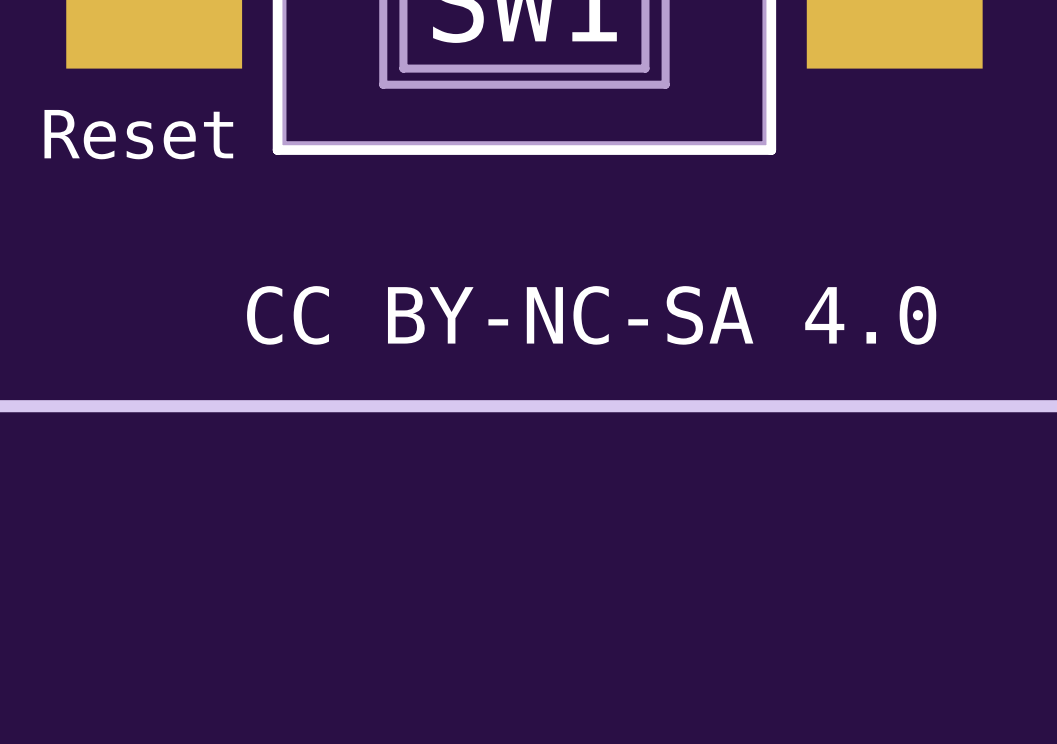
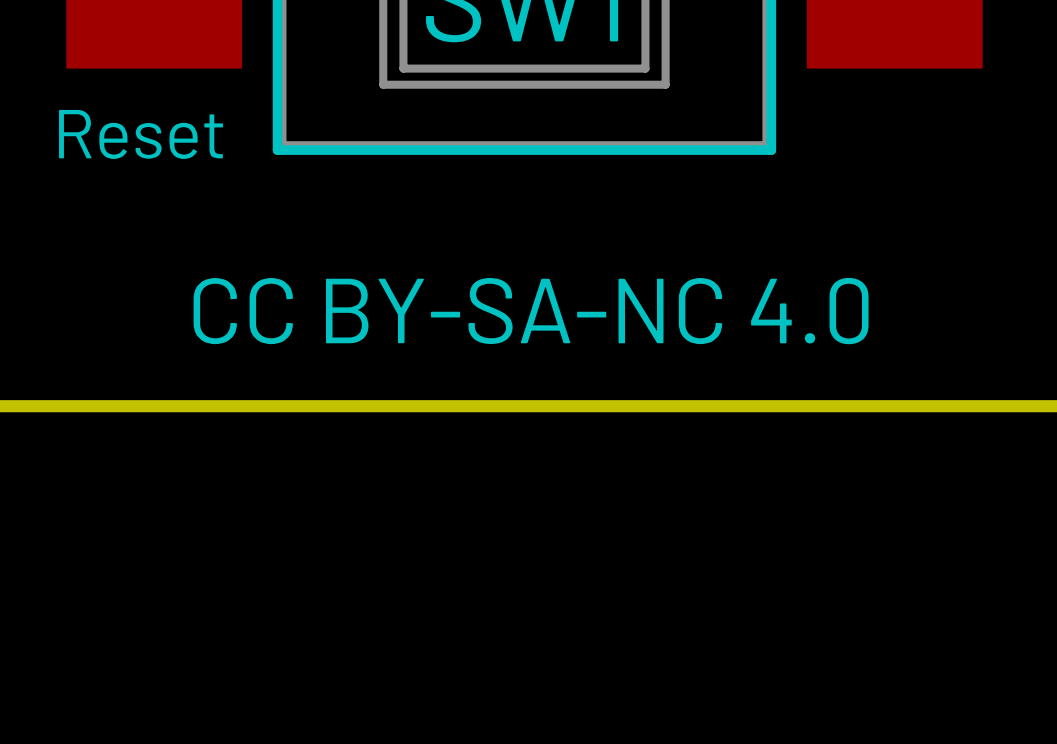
text: CC BY-NC-SA 4.0 (591, 315) -> CC BY-SA-NC 4.0 (531, 311)

